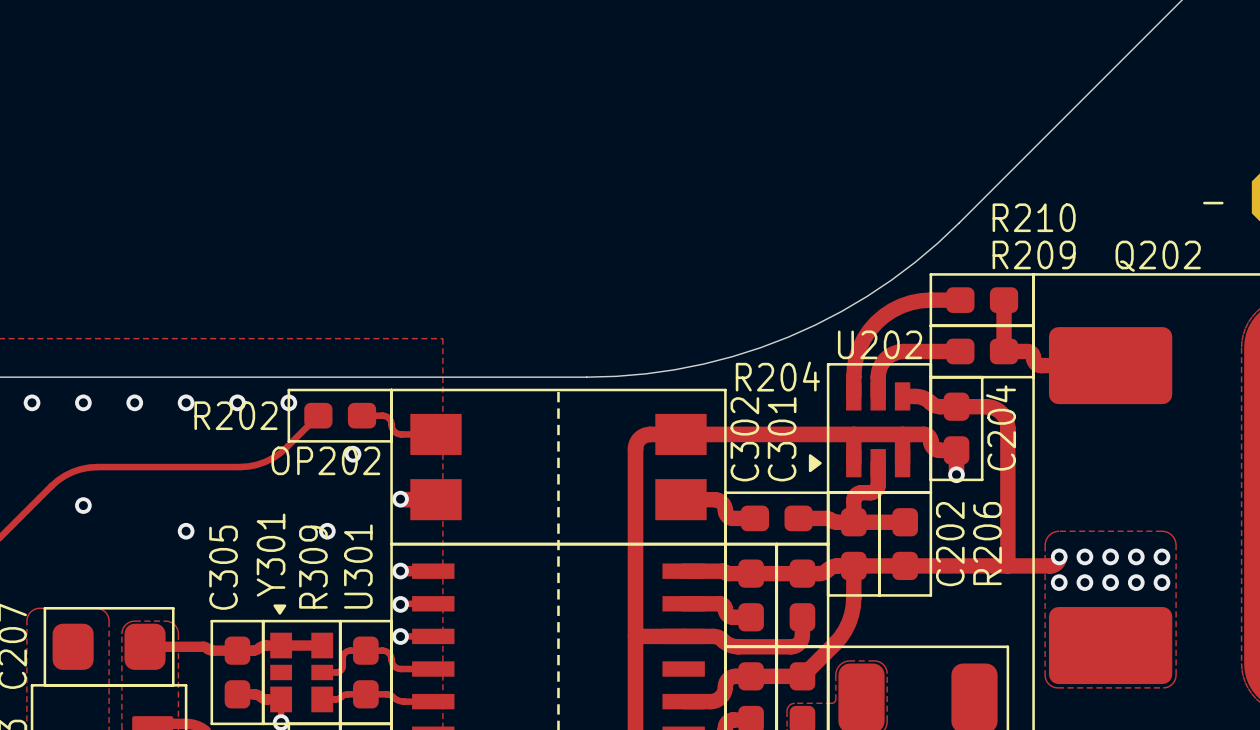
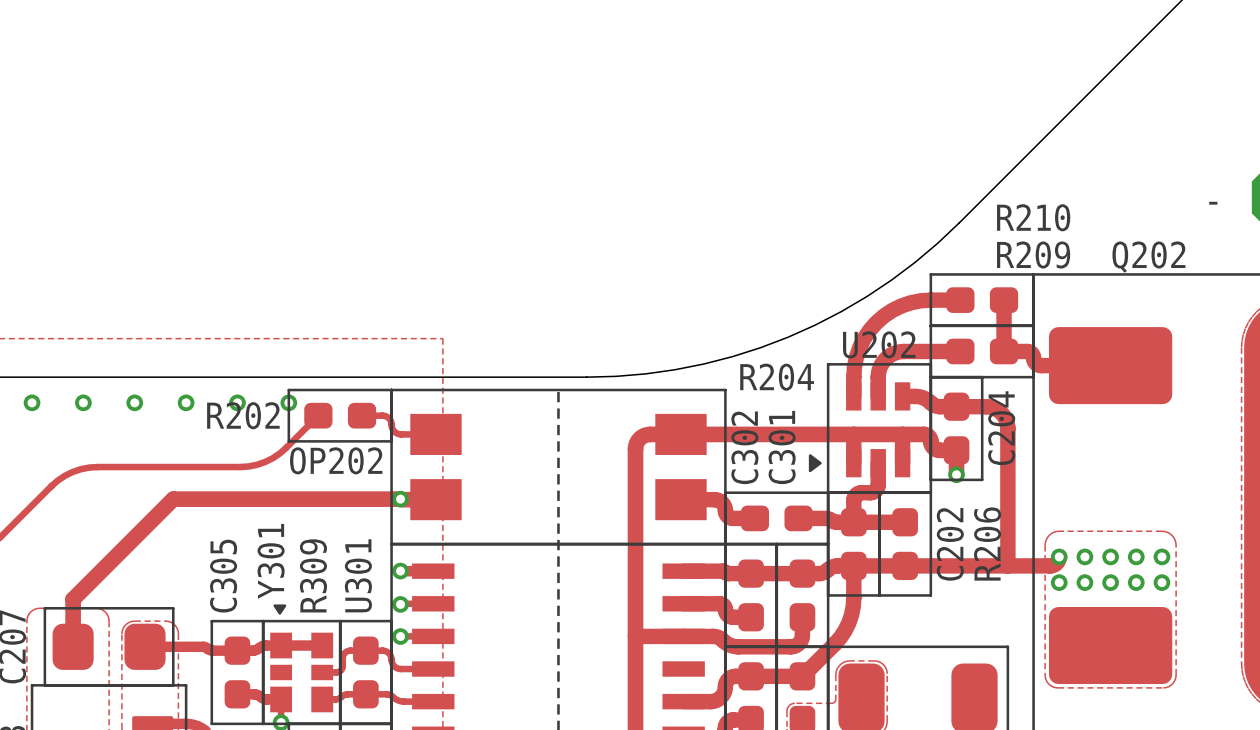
via: (353, 454) -> none
track: none -> (400, 499) (173, 499) (73, 599) (73, 646)
via: (83, 505) -> none
via: (186, 531) -> none
via: (327, 531) -> none

